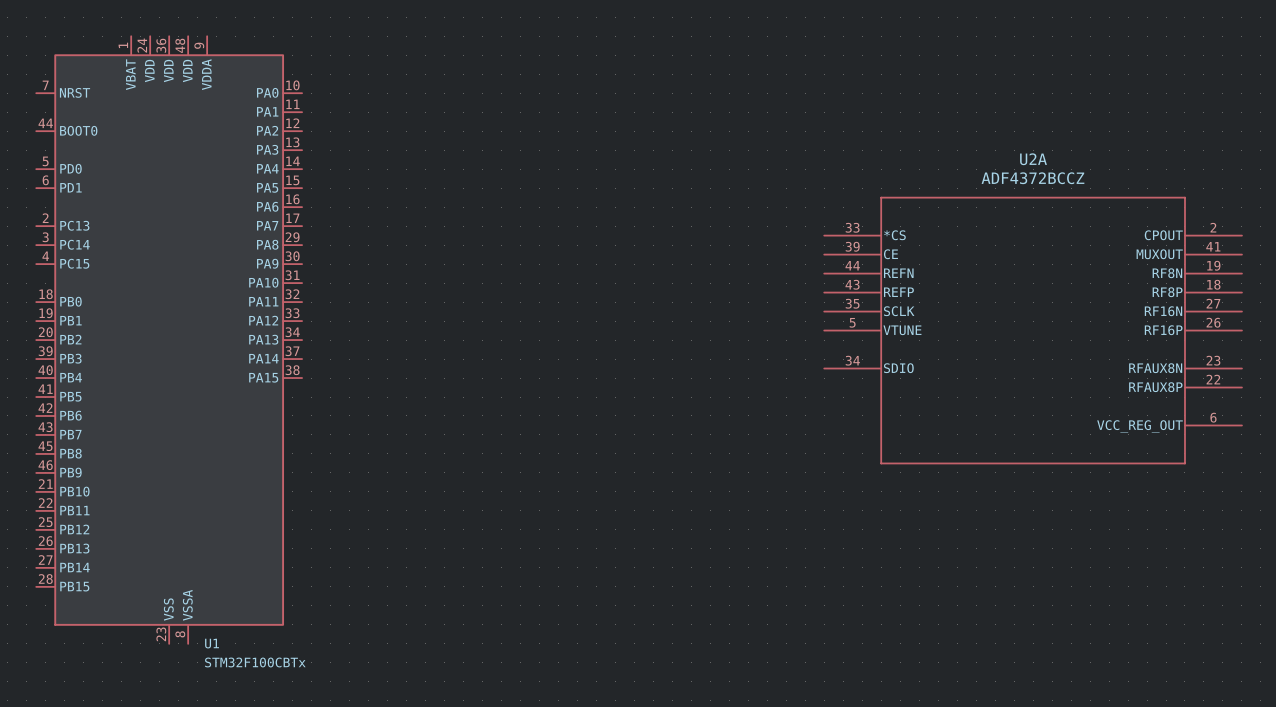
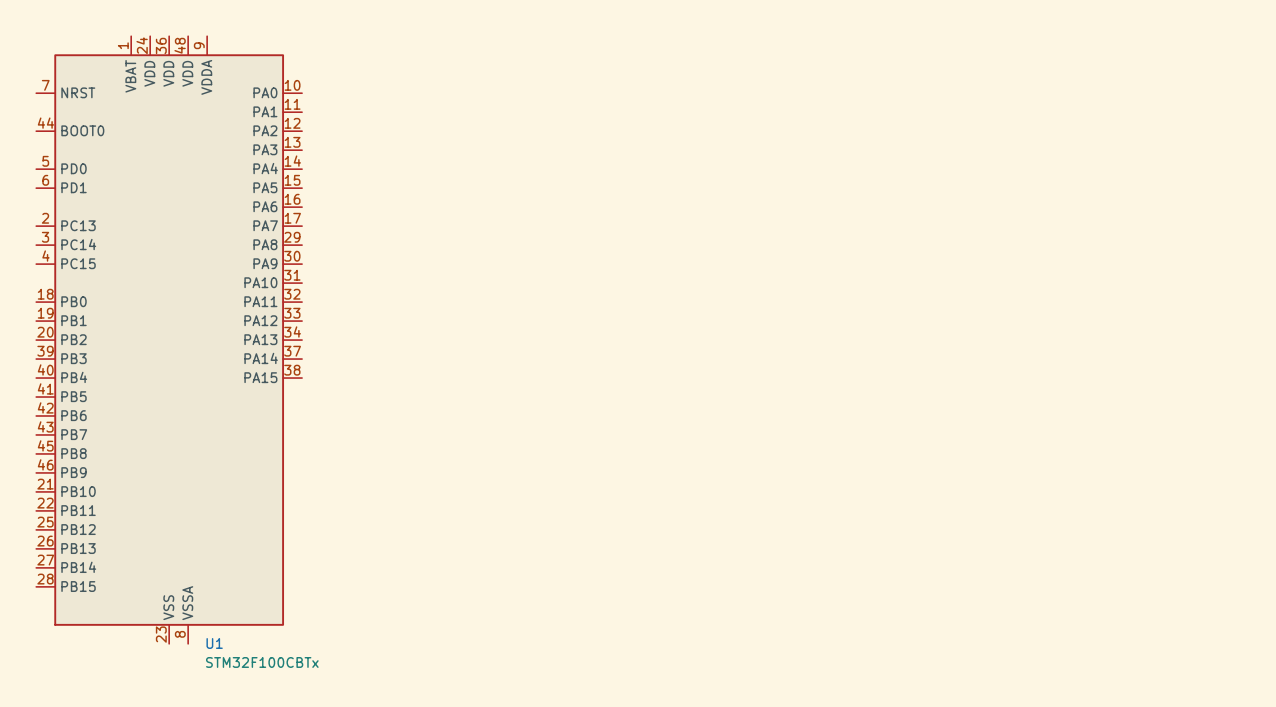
U2A: ADF4372BCCZ (1033, 330) -> none

